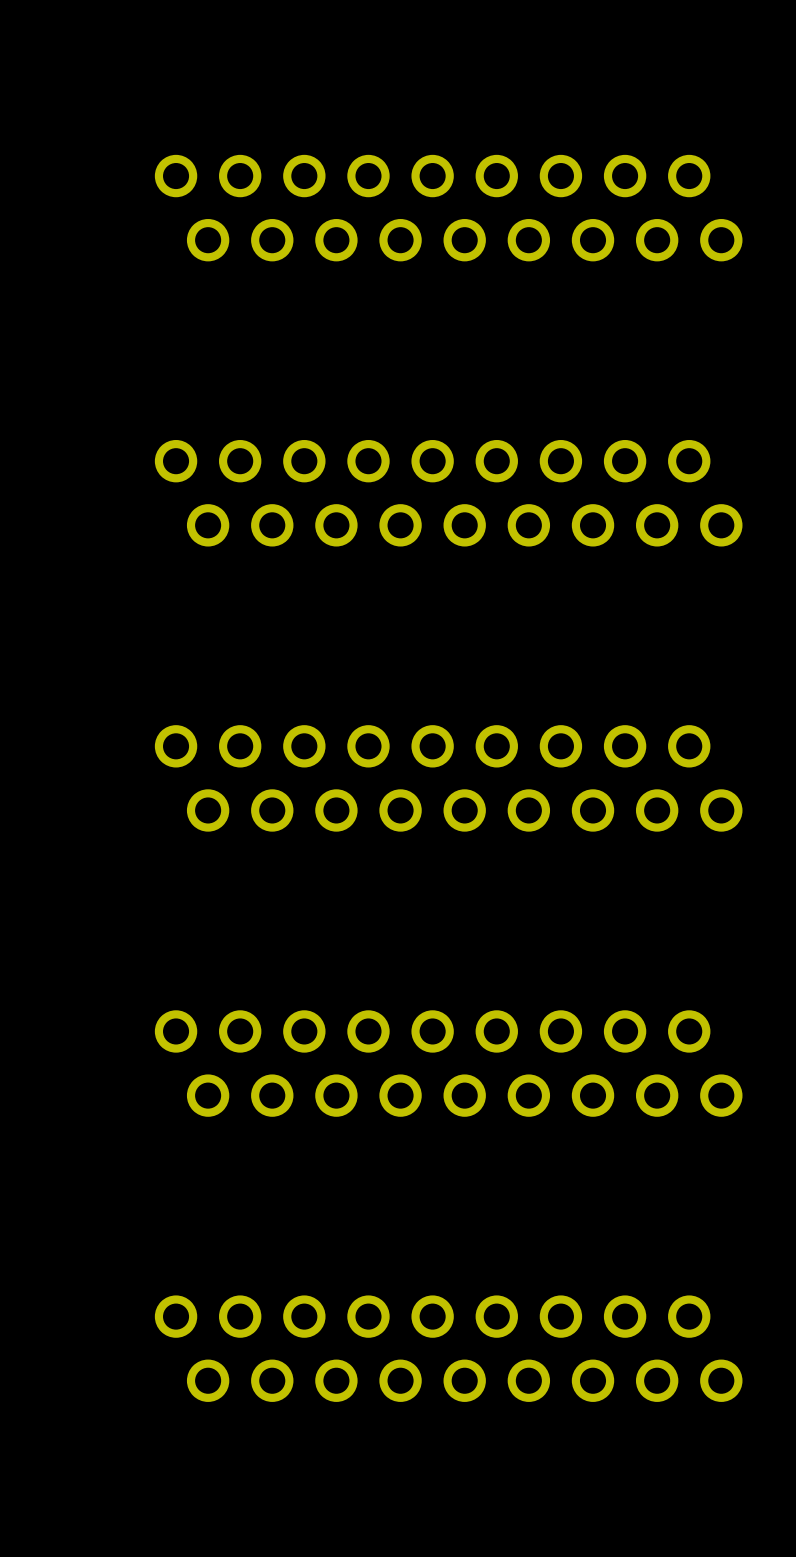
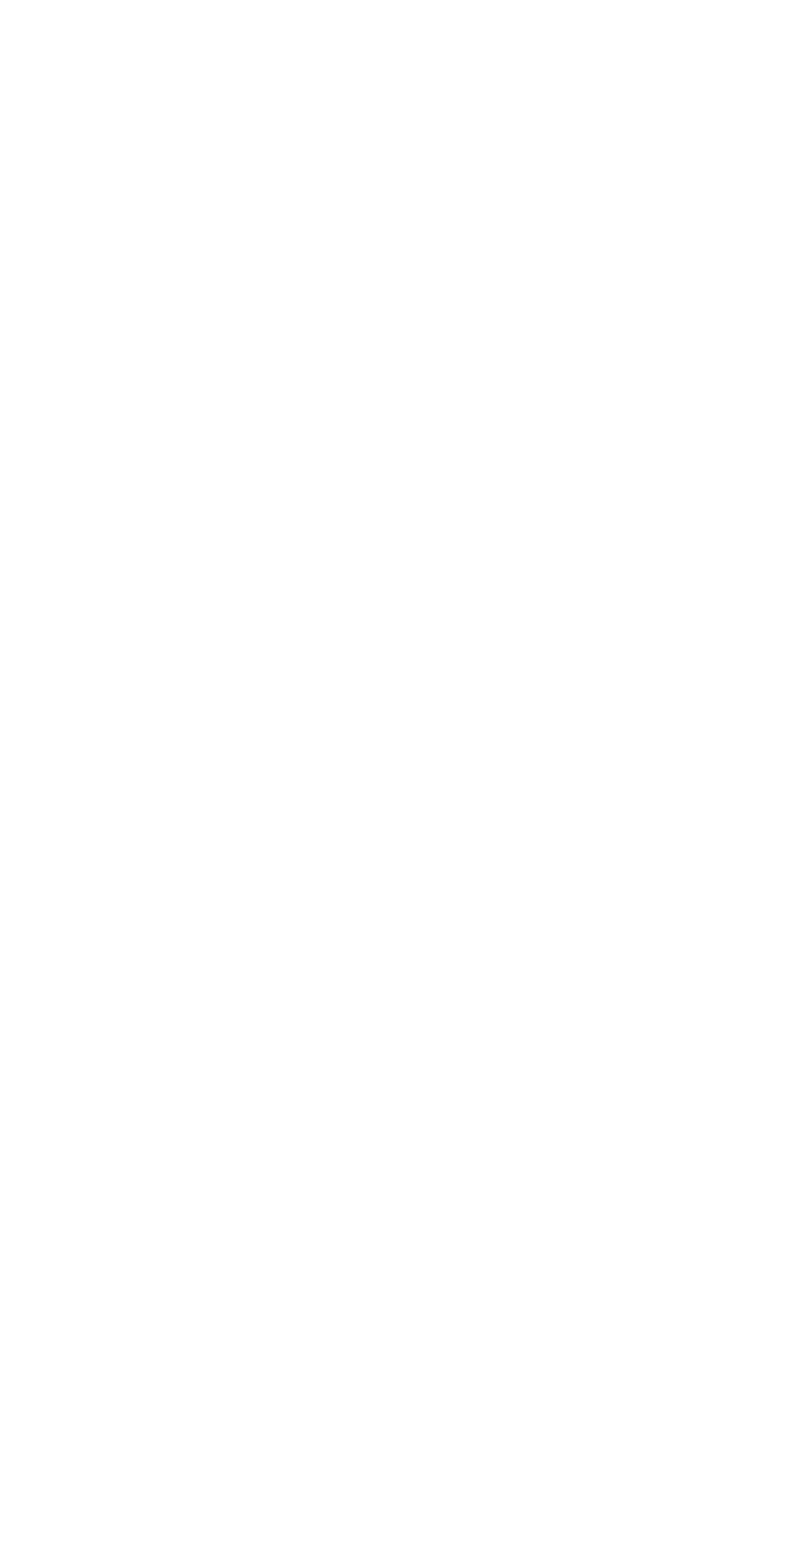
part: (448, 208) -> none
part: (448, 493) -> none
part: (448, 778) -> none
part: (448, 1063) -> none
part: (448, 1348) -> none

